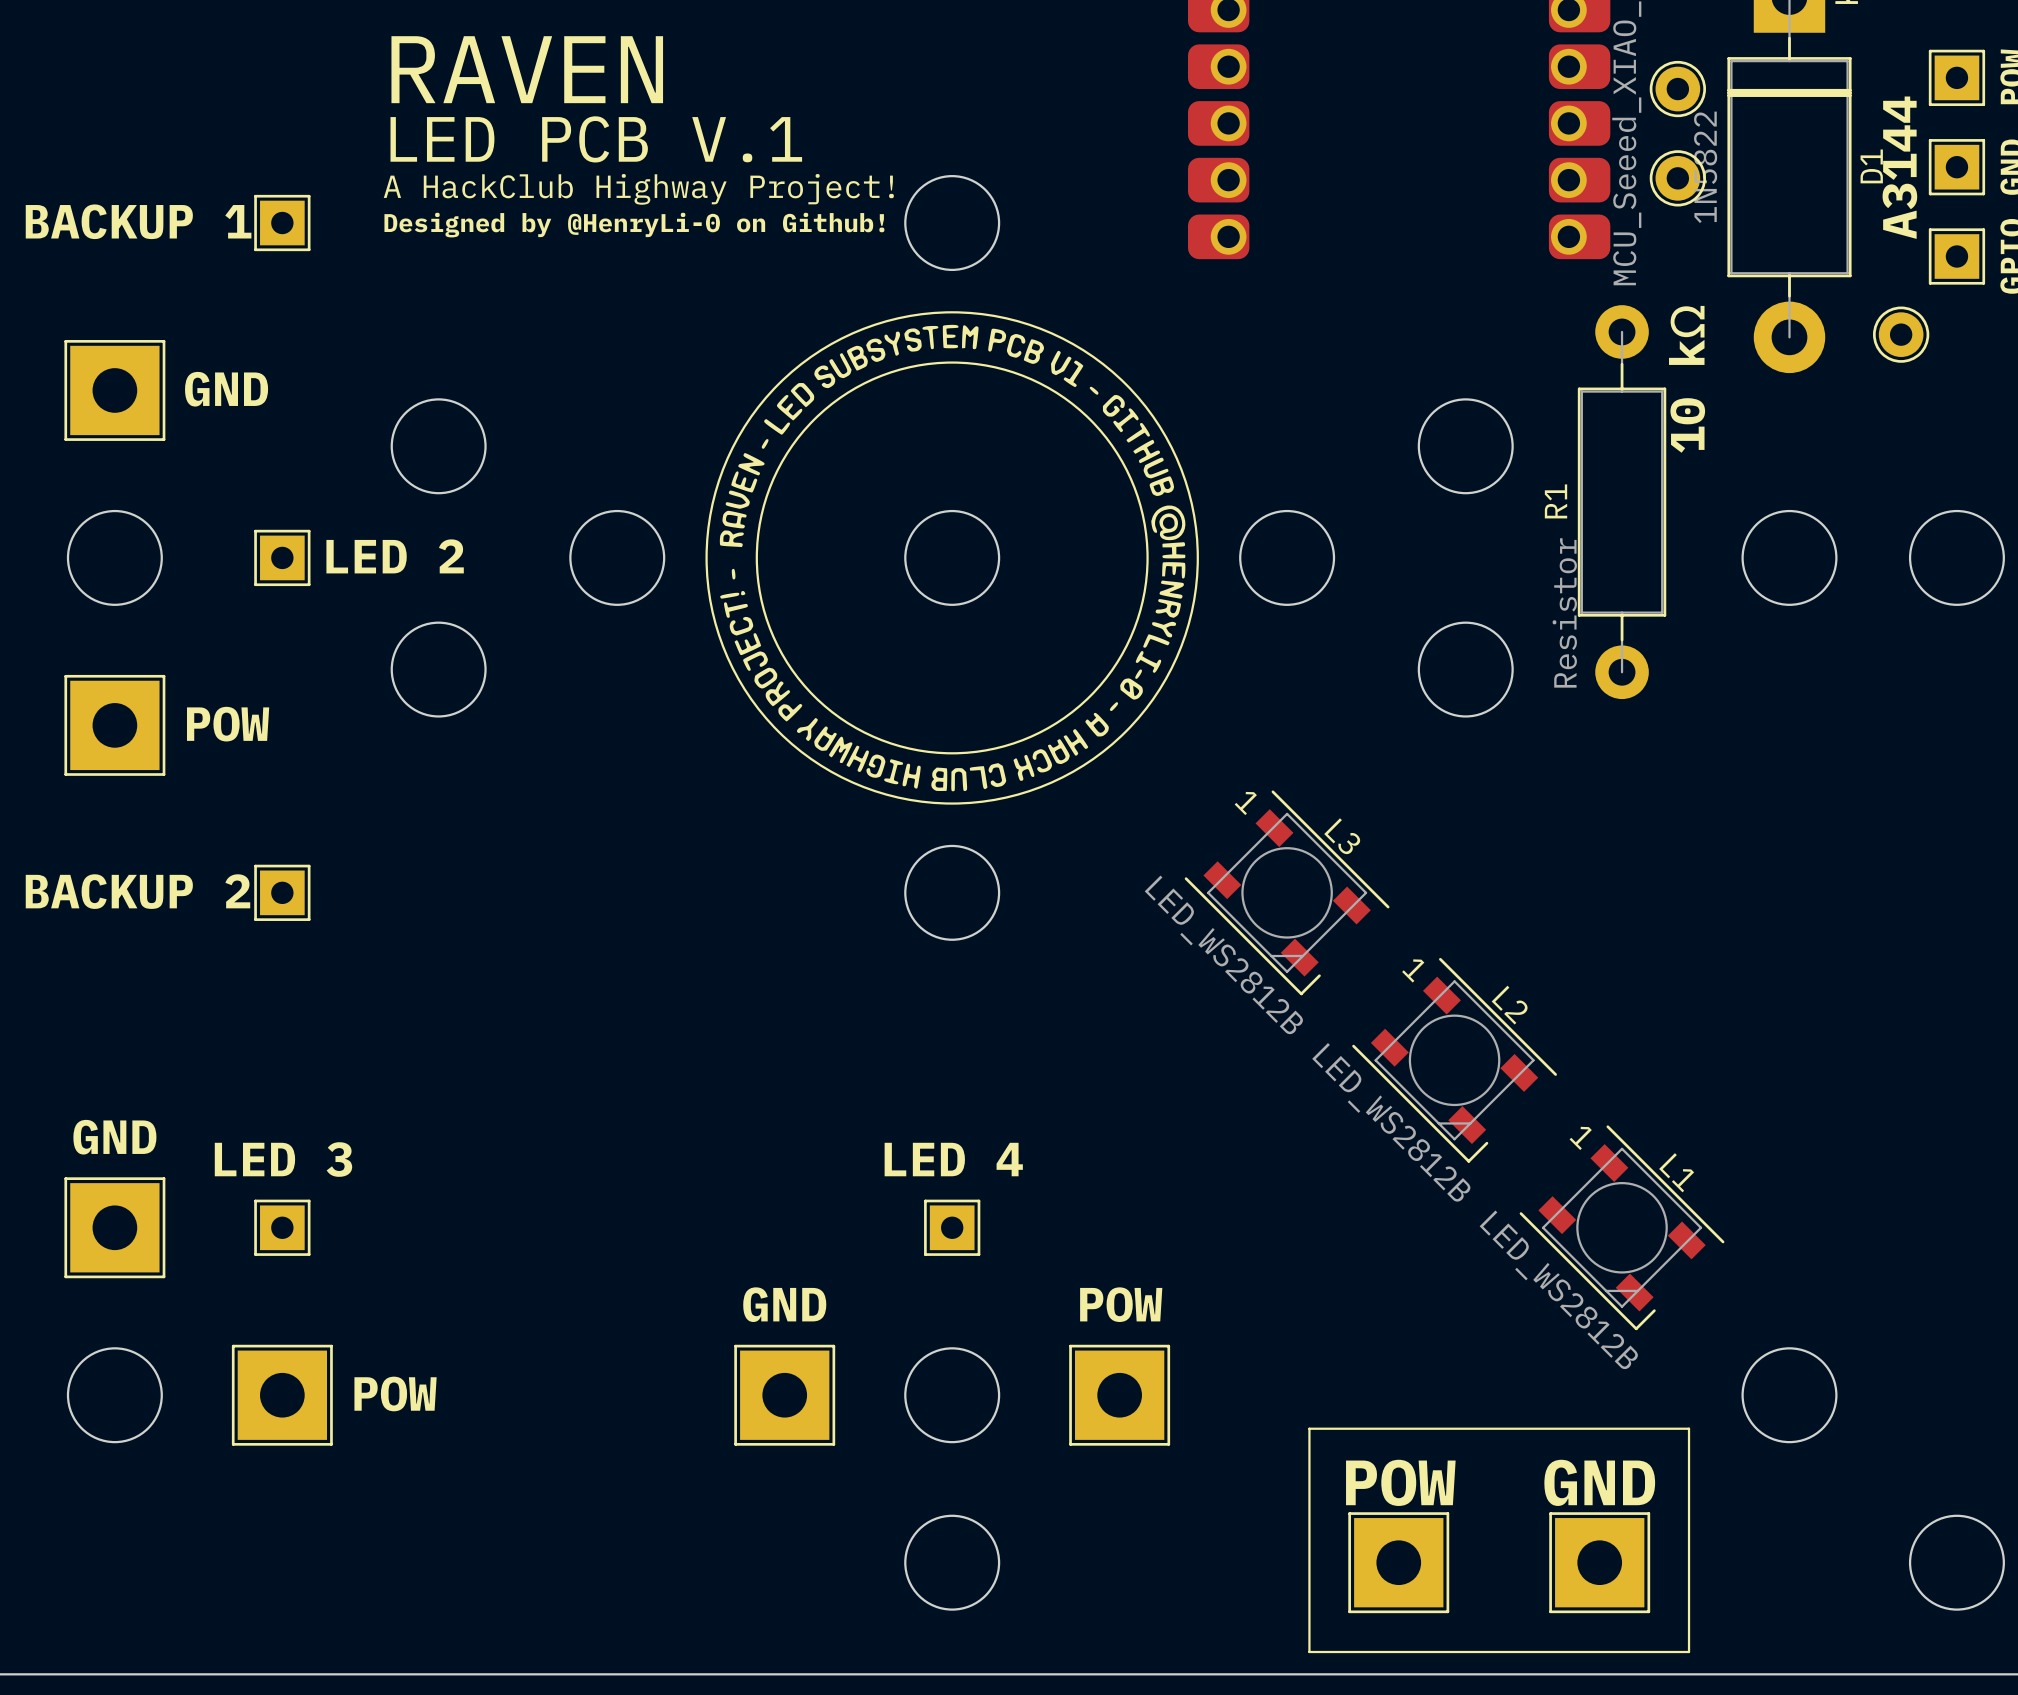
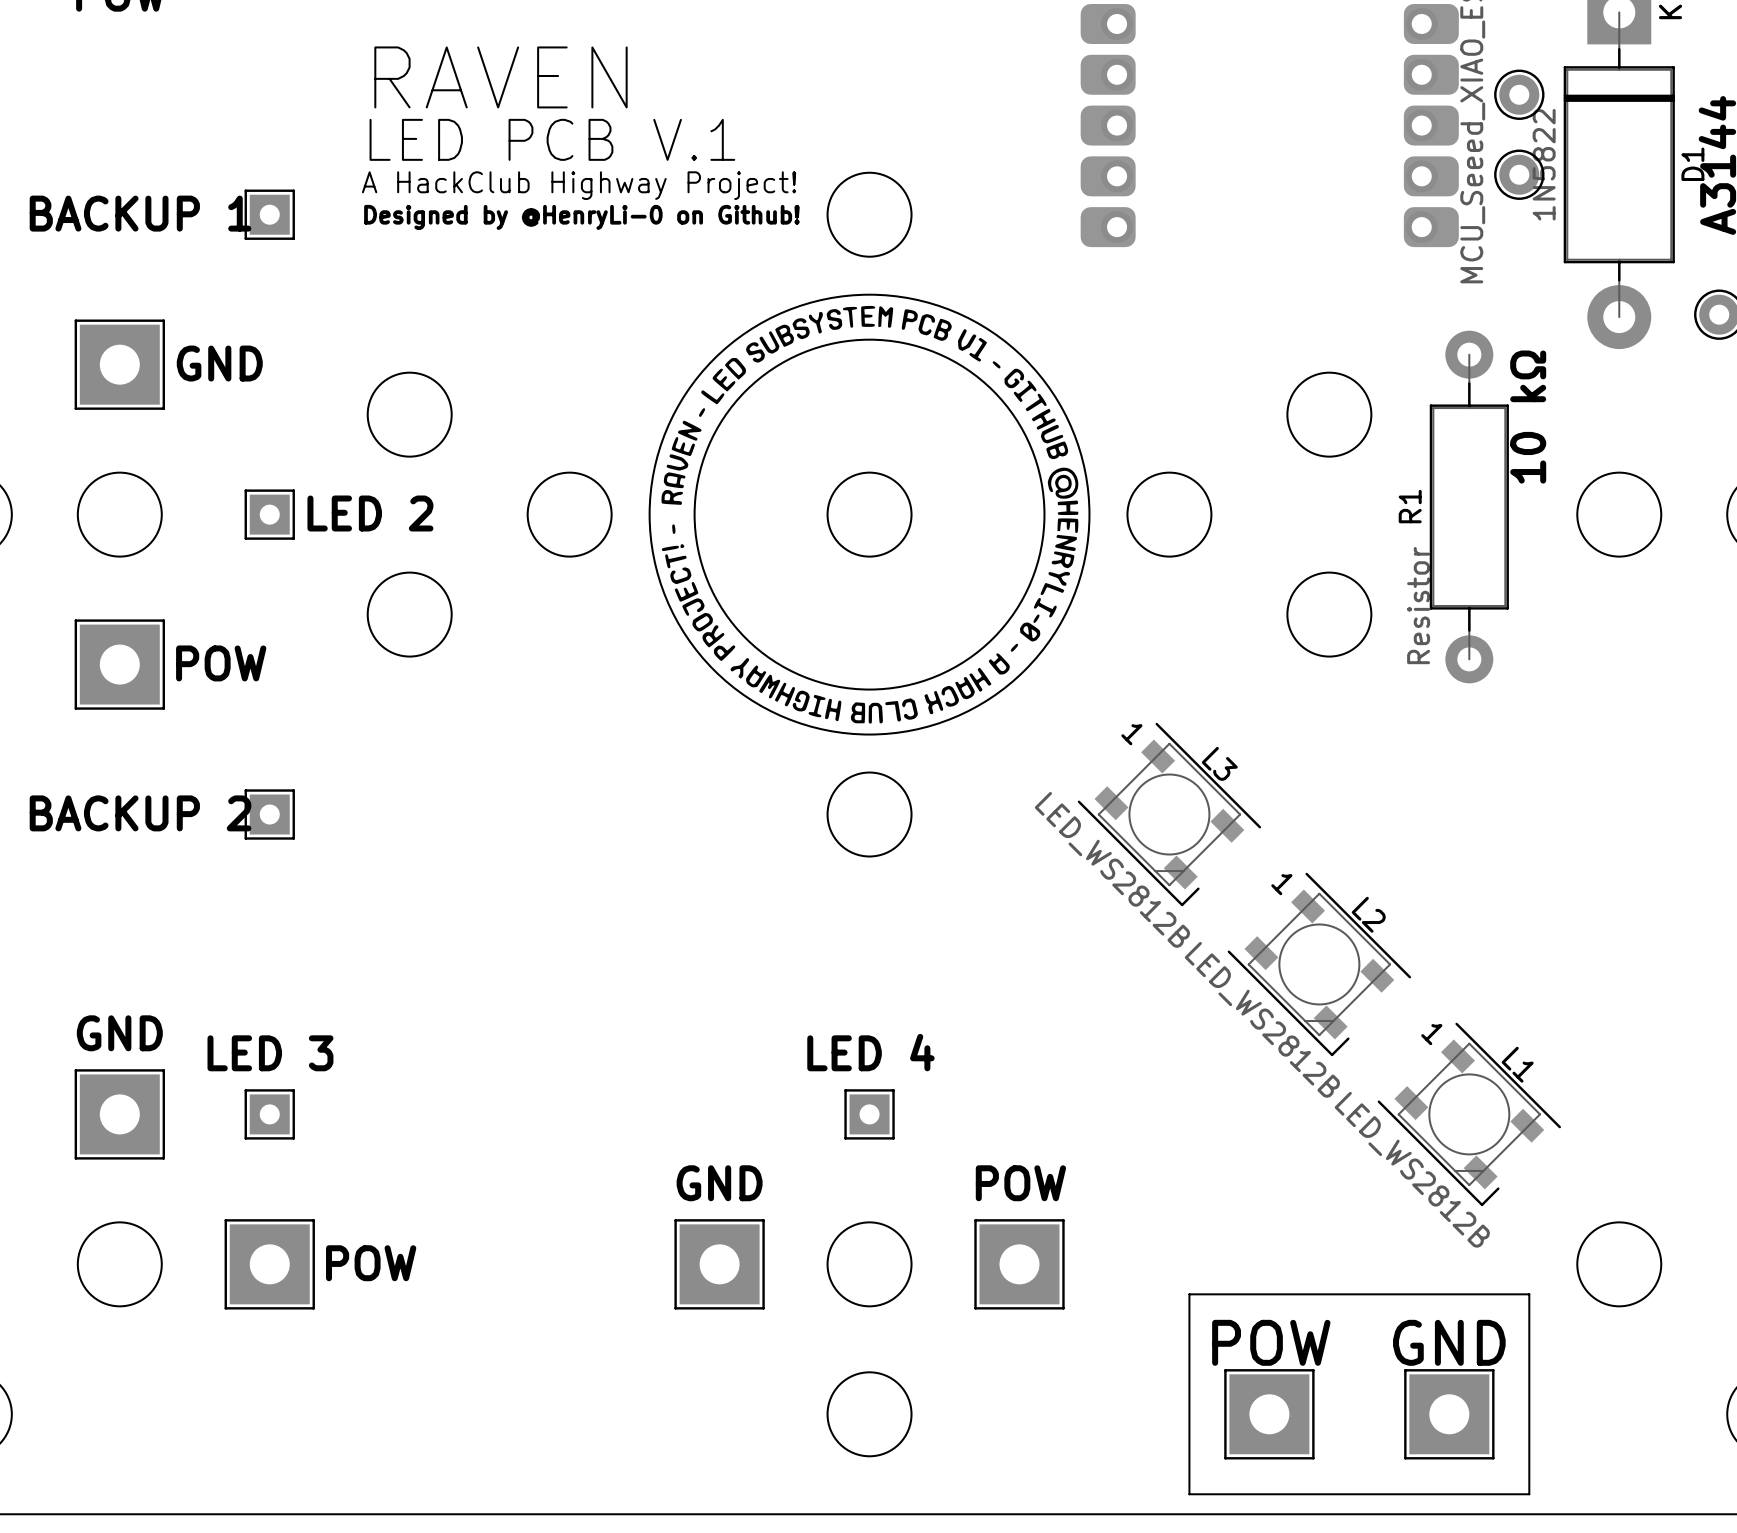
text position: 10 kΩ (1687, 379) -> 10 kΩ (1528, 417)
R1 position: (1622, 502) -> (1469, 507)

